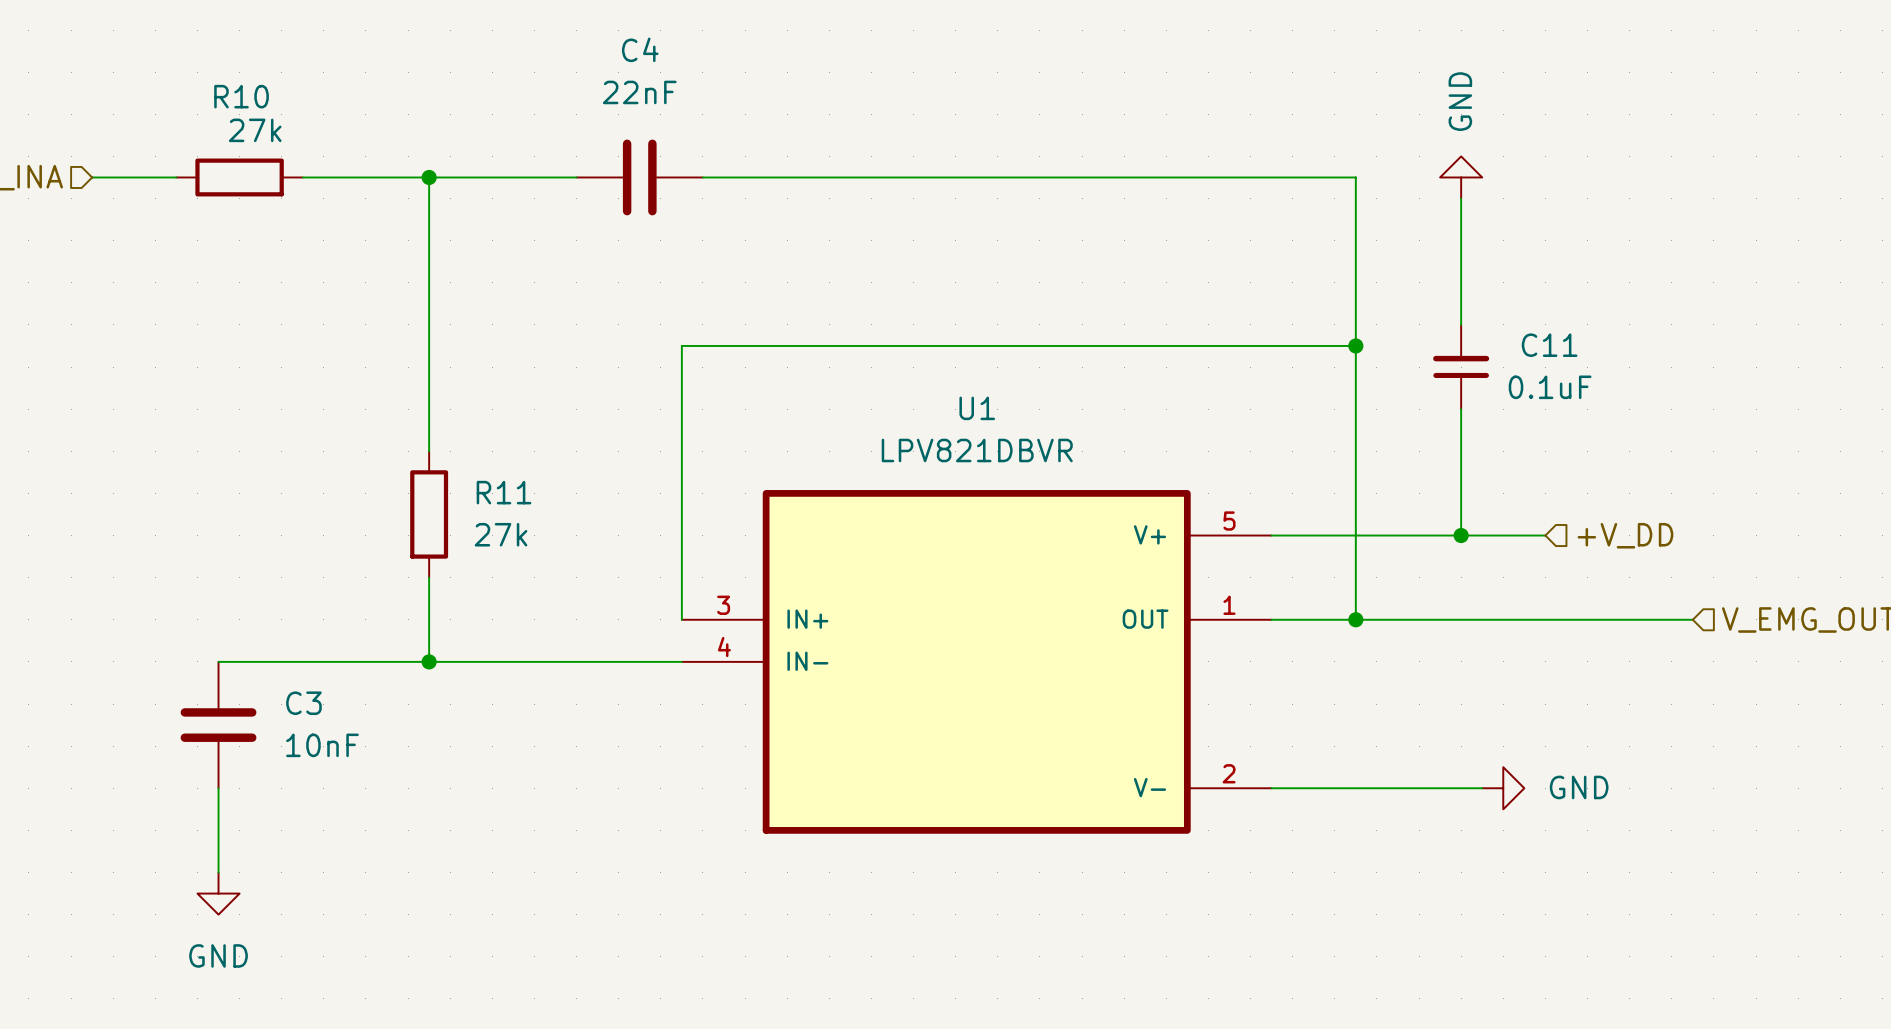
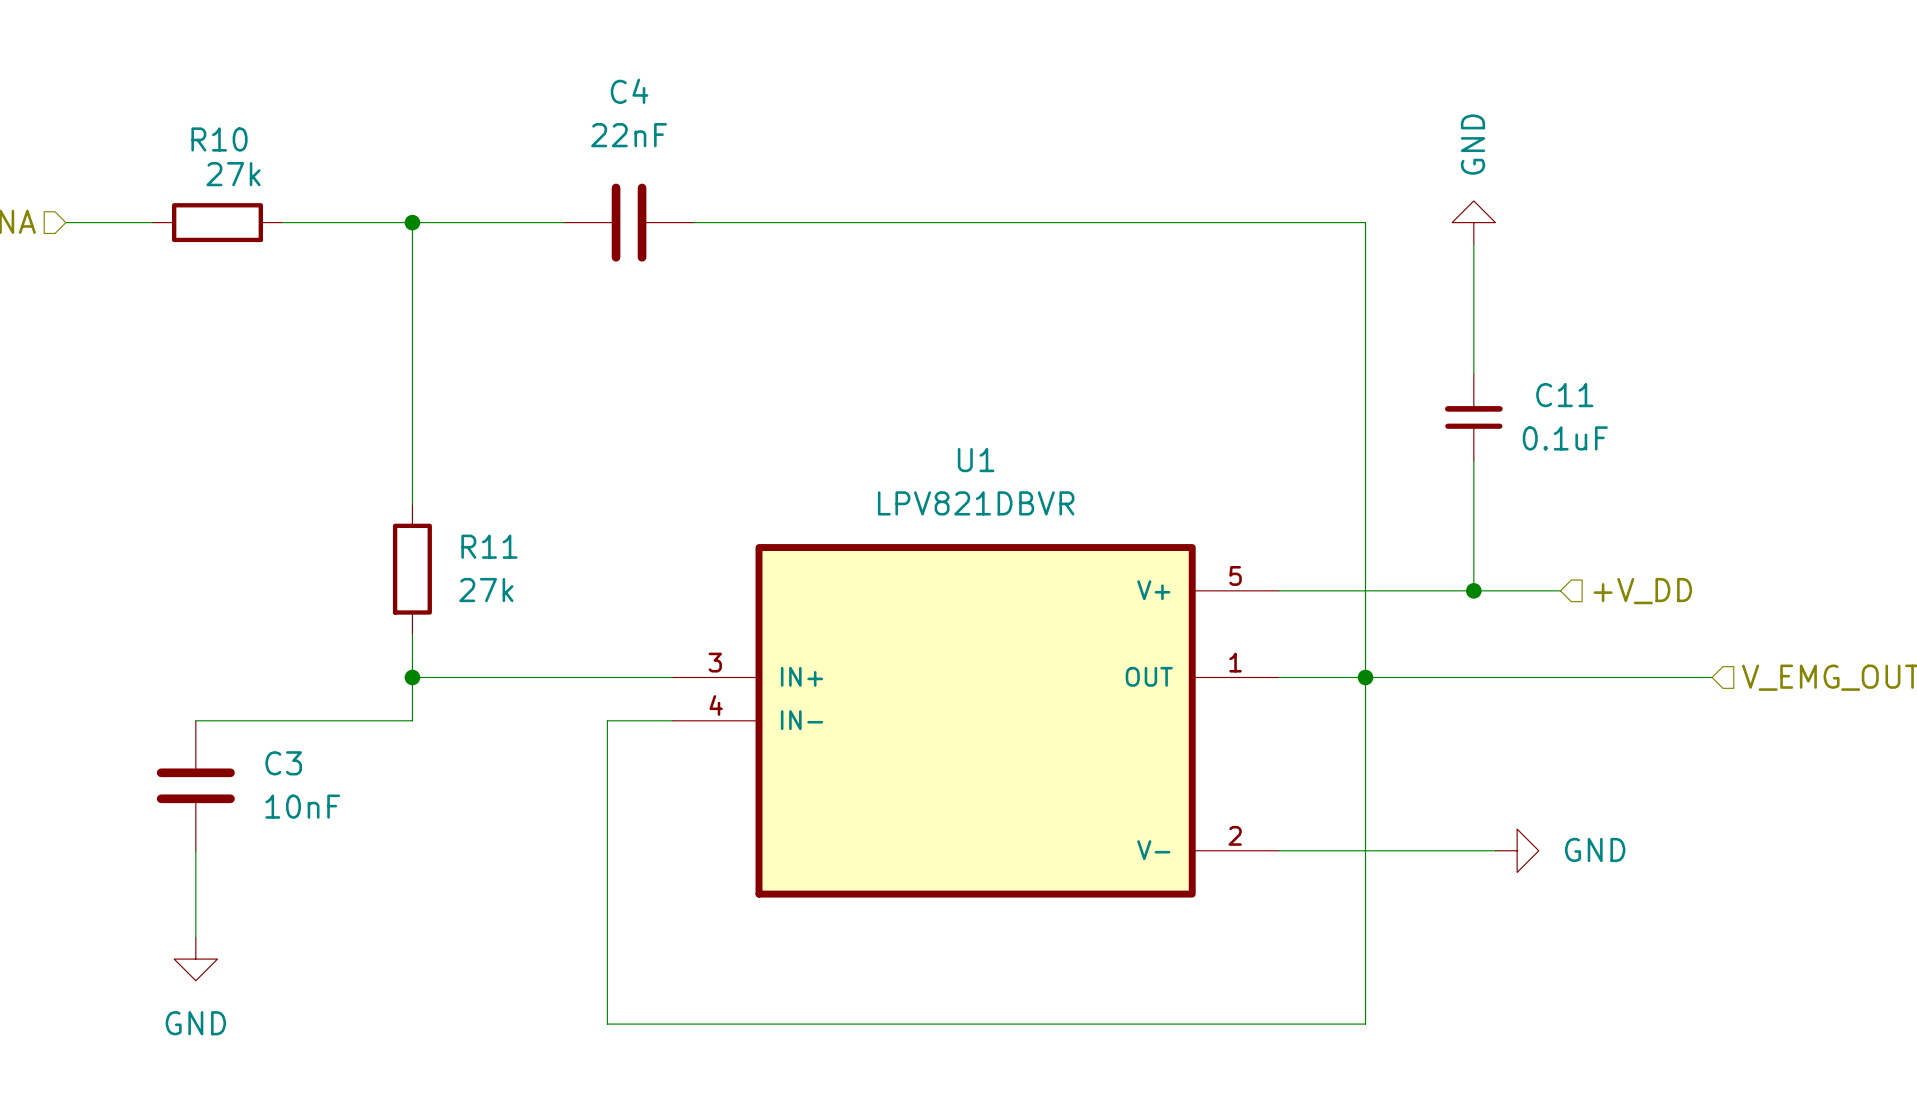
wire: (1355, 345) (681, 345) (681, 619) -> (412, 677) (672, 677)
junction: (1355, 345) -> none
wire: (429, 661) (618, 661) -> (1365, 677) (1365, 1024) (607, 1024) (607, 720)
junction position: (429, 661) -> (412, 677)

